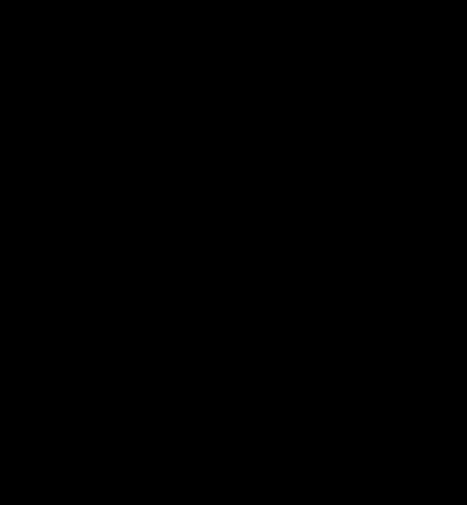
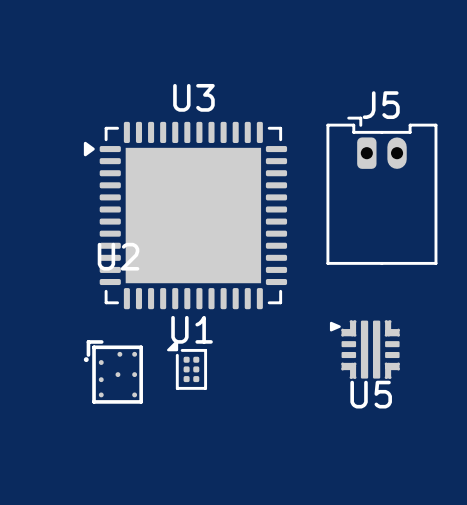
J5: none -> (381, 190)
U3: none -> (185, 215)
U5: none -> (364, 349)
U1: none -> (187, 364)
part: none -> (113, 371)

